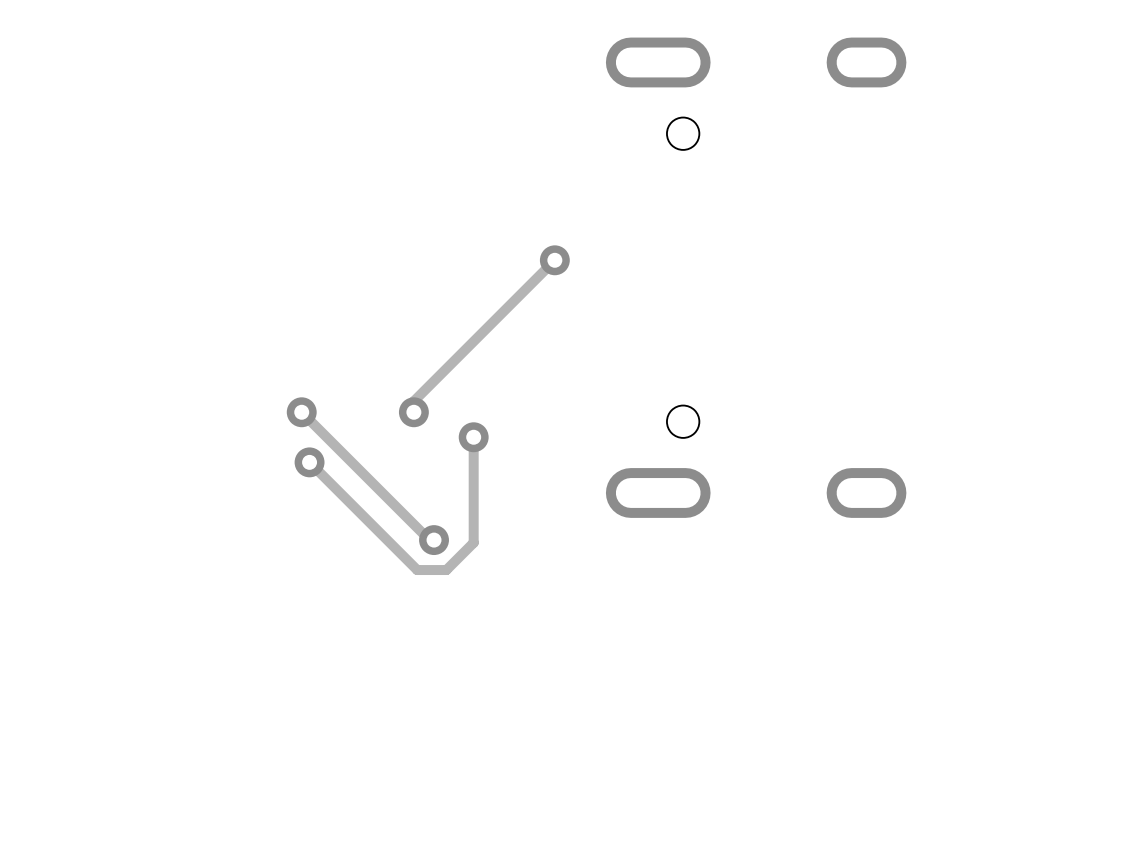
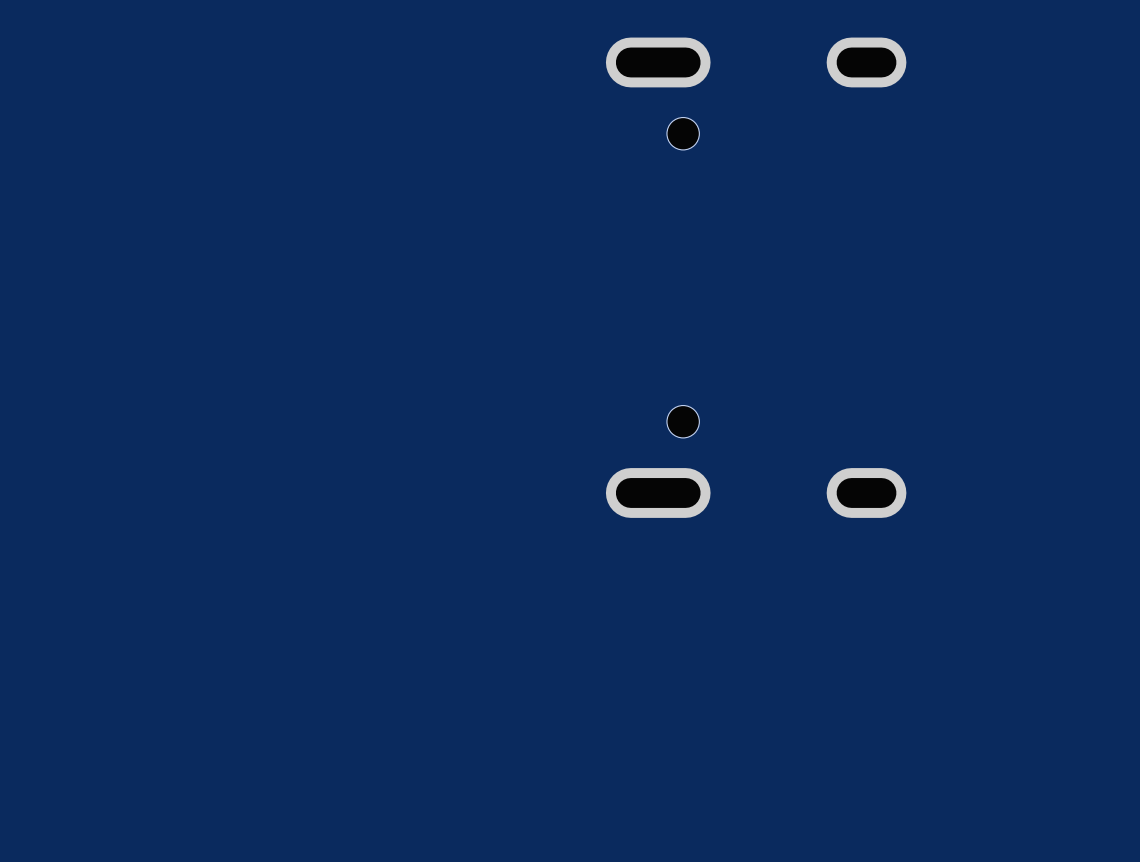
track: (554, 260) (413, 401) (413, 412) -> none
via: (554, 260) -> none
track: (301, 412) (429, 540) (434, 540) -> none
via: (301, 412) -> none
via: (413, 412) -> none
track: (473, 437) (473, 542) (446, 570) (417, 570) (309, 462) -> none
via: (473, 437) -> none
via: (309, 462) -> none
via: (434, 540) -> none

